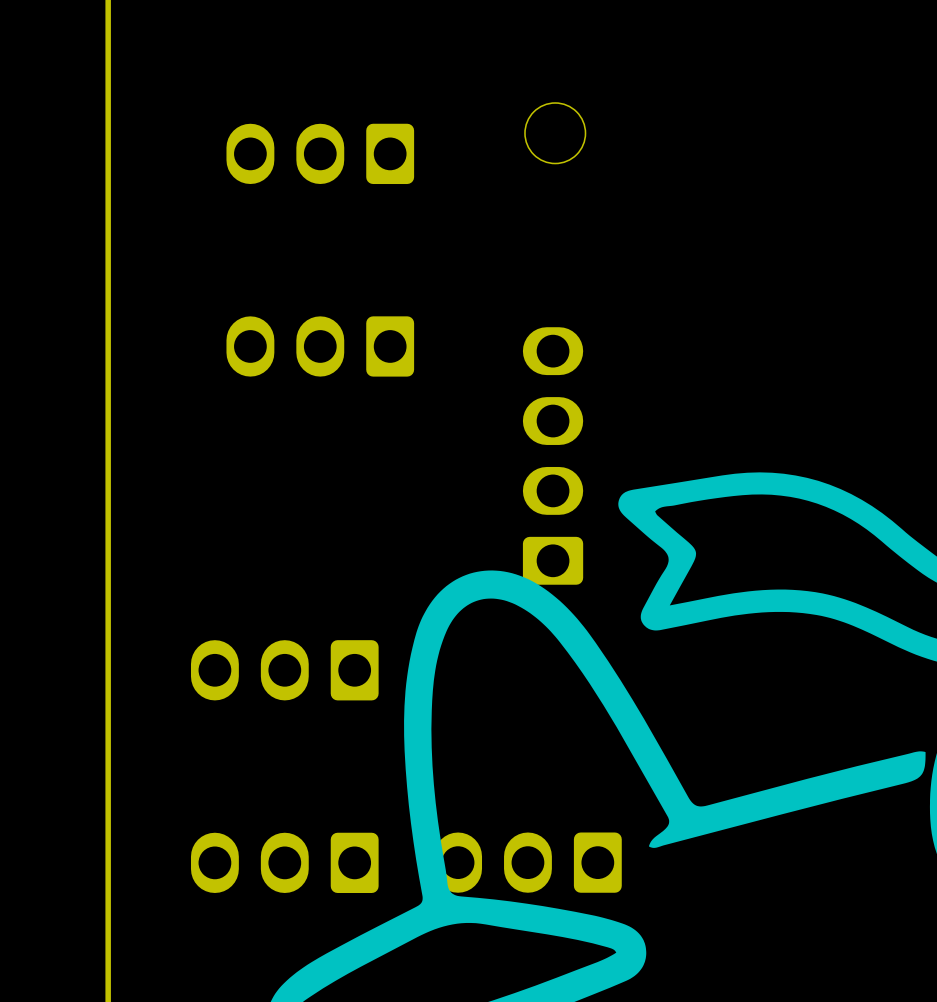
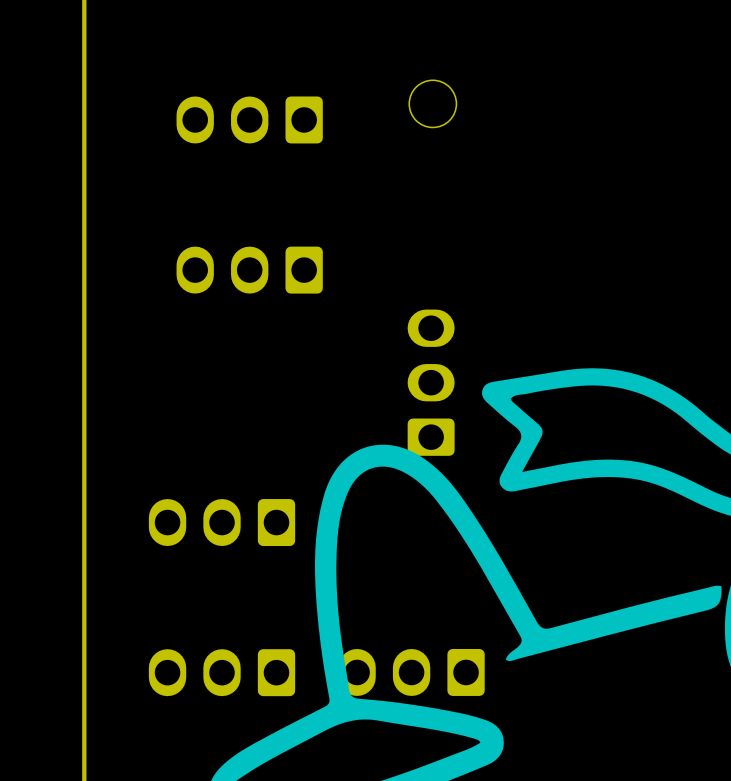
part: (553, 455) -> none

